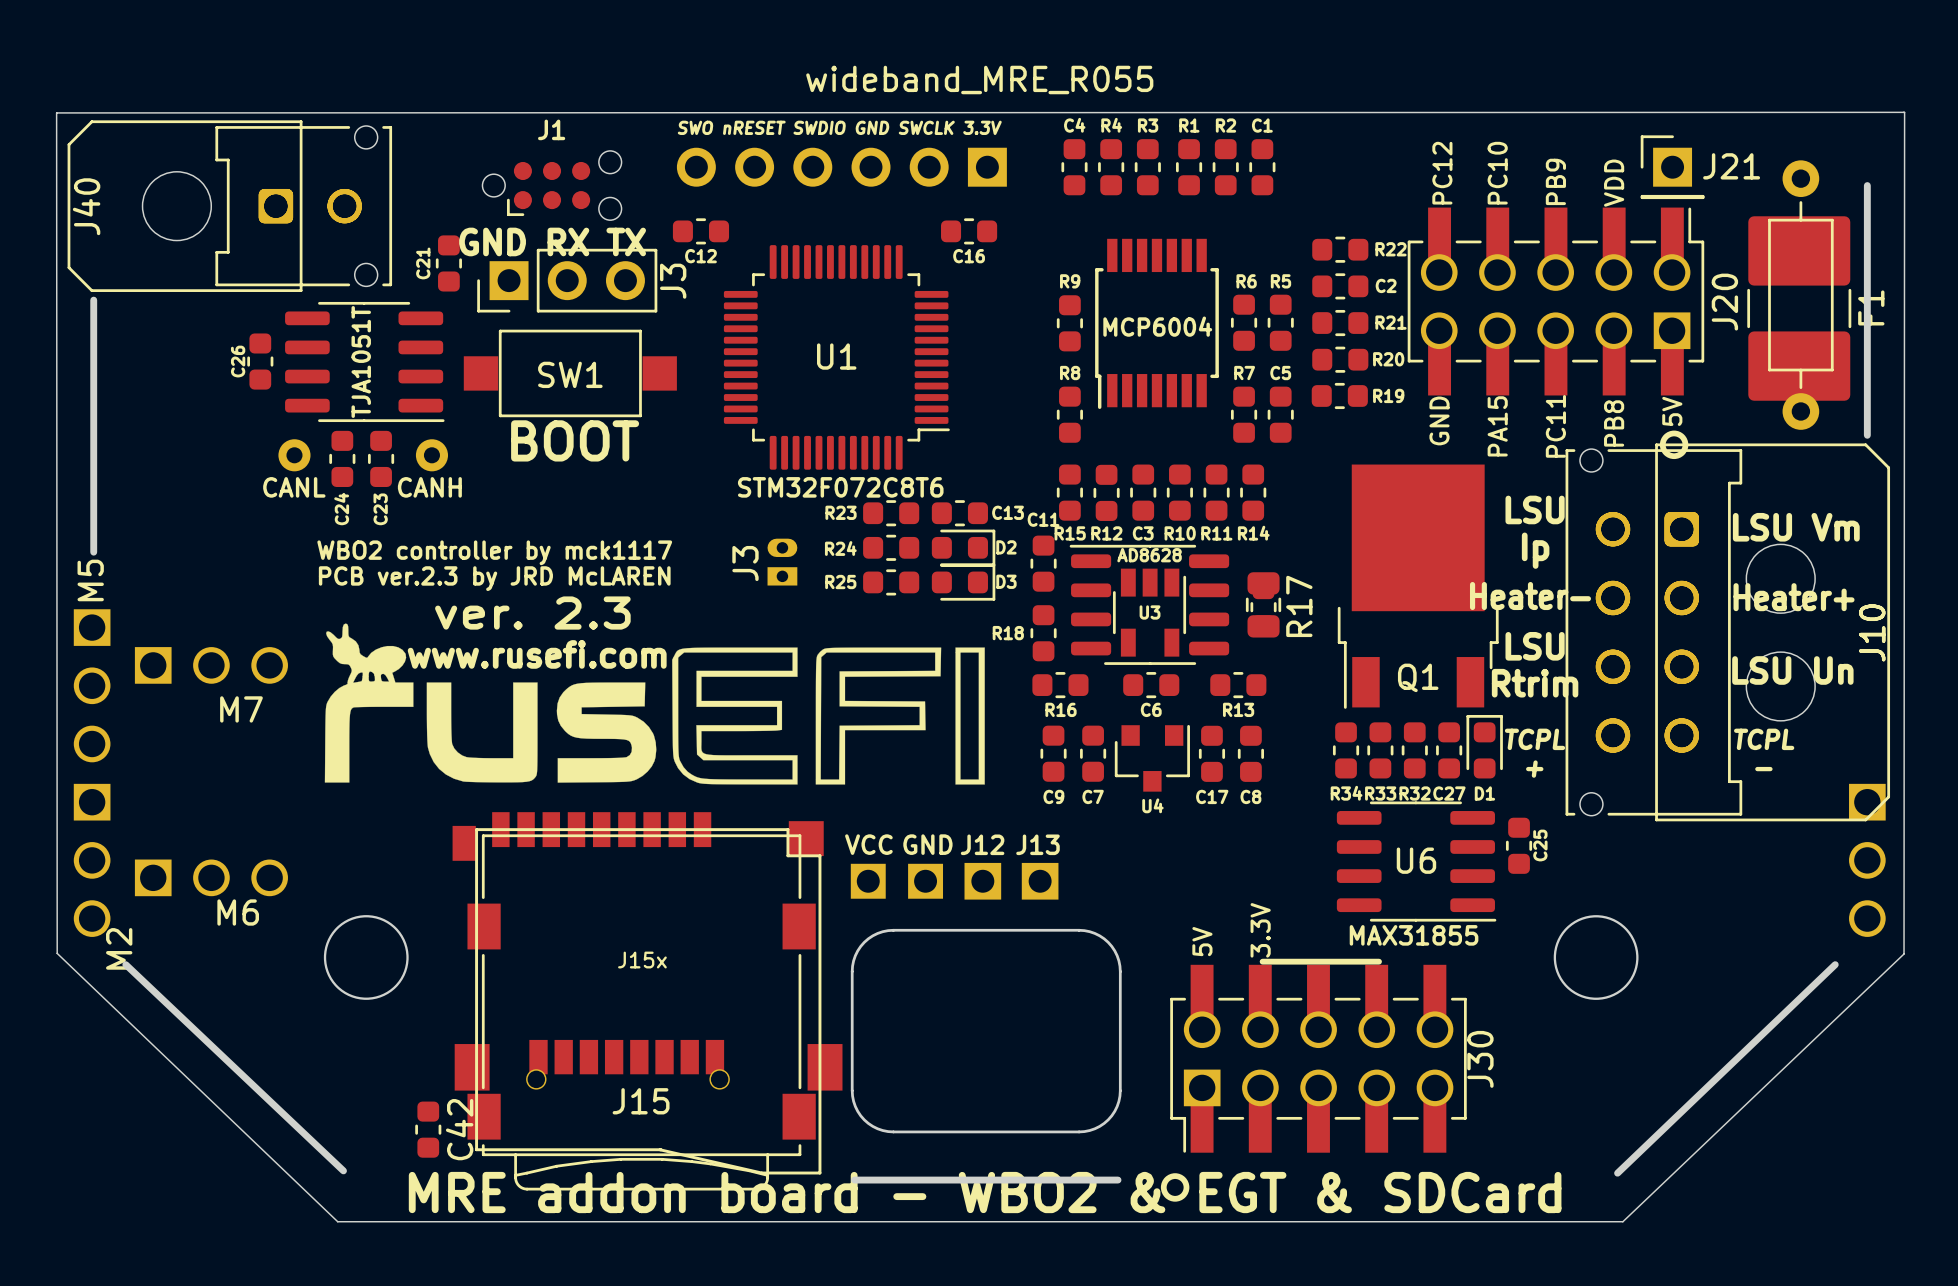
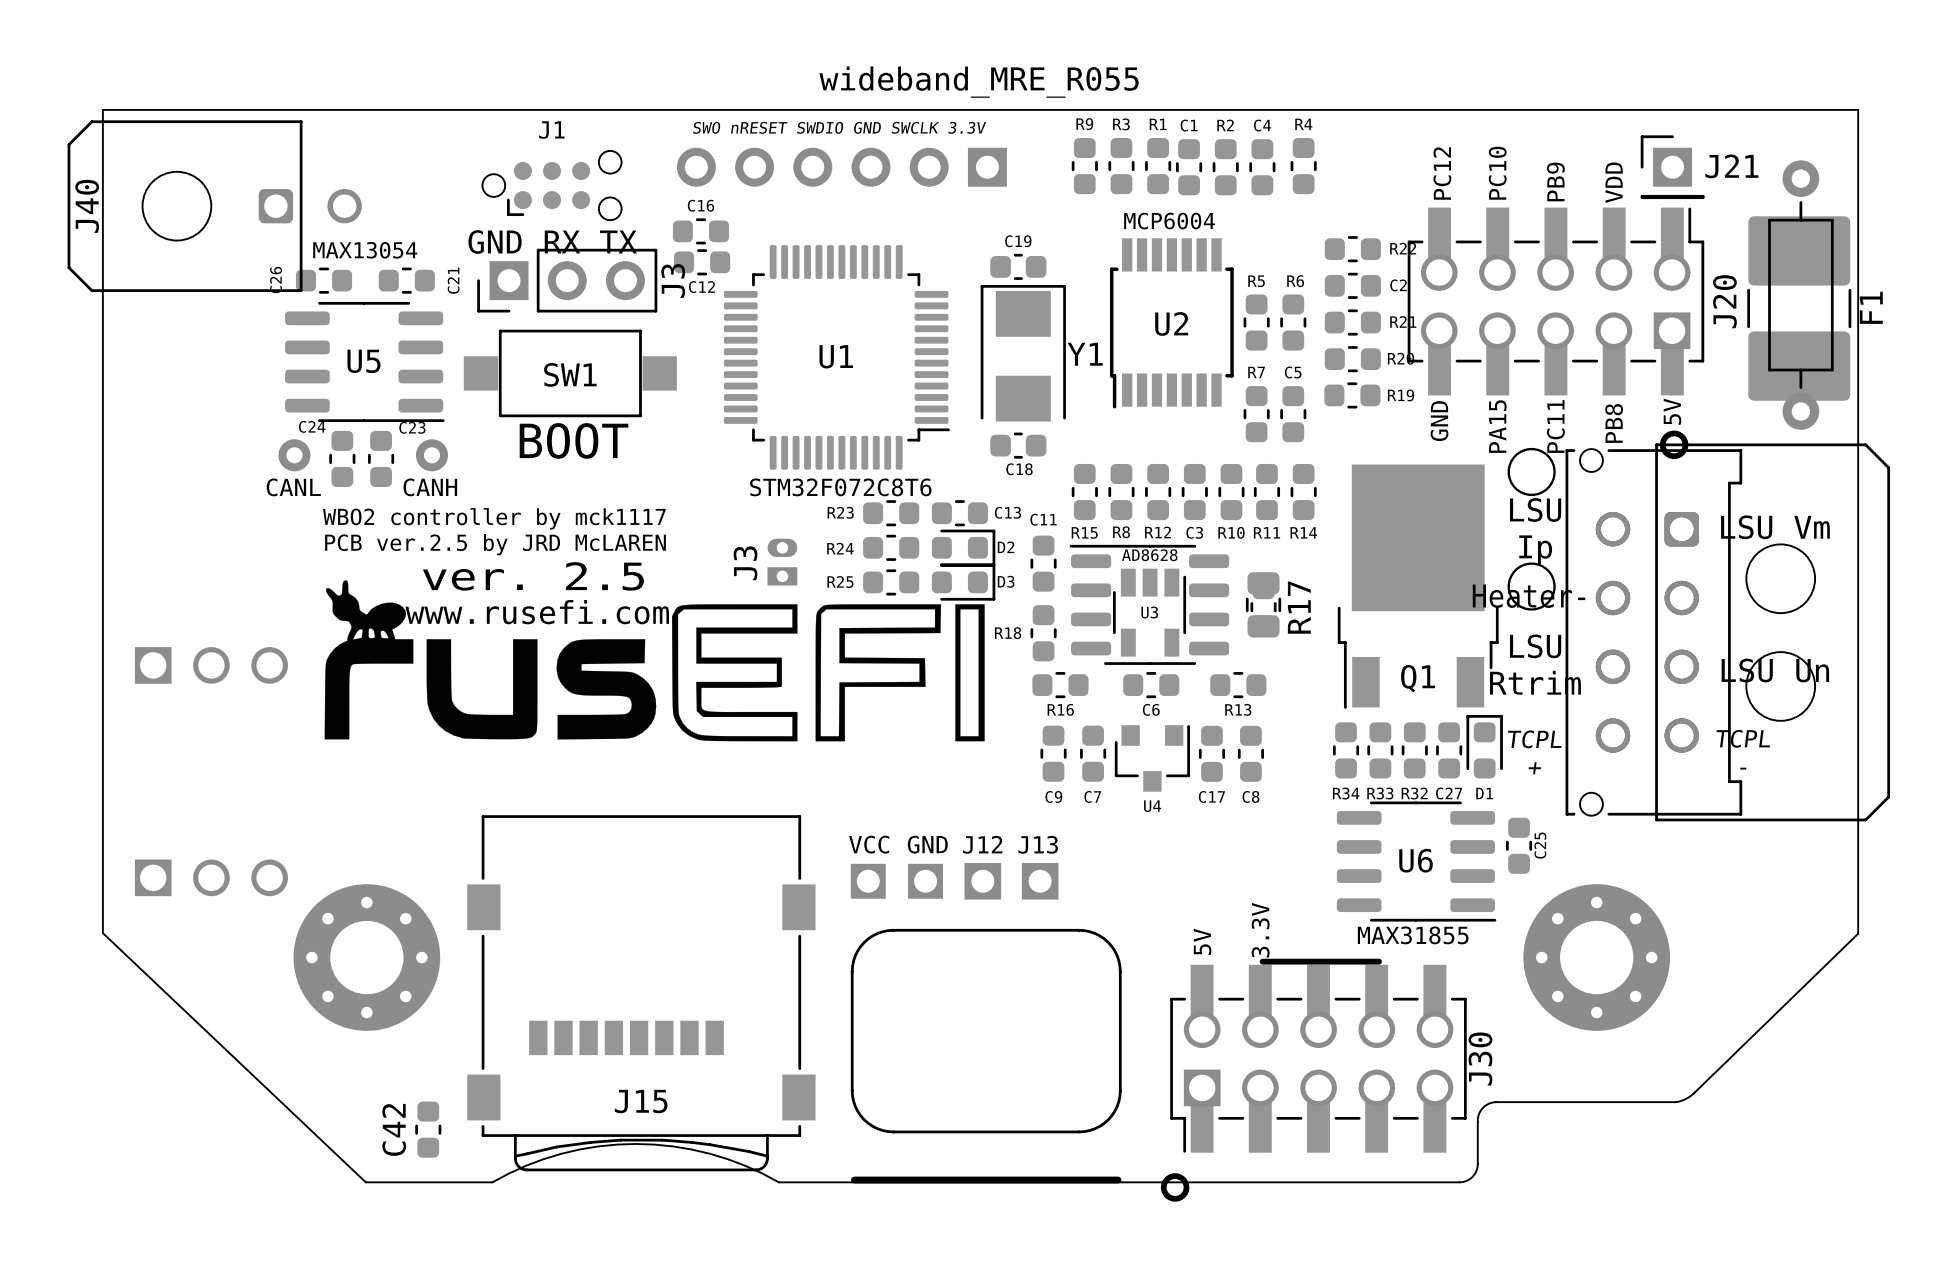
board edge: (1903, 112) (1904, 953) (1622, 1221) (337, 1221) (57, 953) (56, 112) (1903, 112) -> (102, 109) (102, 933) (365, 1182) (492, 1182) (526, 1165) (561, 1153) (598, 1146) (635, 1143) (673, 1146) (709, 1153) (745, 1165) (778, 1182) (1461, 1182) (1470, 1178) (1477, 1168) (1478, 1117) (1485, 1105) (1495, 1102) (1676, 1102) (1683, 1100) (1694, 1092) (1858, 933) (1858, 109) (102, 109)
R1 name: R1 (1189, 125) -> C1 (1189, 125)
C1 name: C1 (1262, 125) -> C4 (1262, 125)
R1: none -> (1158, 166)
C4: (1074, 167) -> none
R4 position: (1111, 167) -> (1303, 166)
R3 position: (1147, 167) -> (1121, 166)
board edge: (1867, 185) (1867, 435) -> none
part: (303, 206) -> none
C16: (969, 231) -> none
text: none -> MAX13054 (365, 250)
R22 position: (1340, 249) -> (1352, 249)
C12 name: C12 (700, 256) -> C16 (700, 205)
C12: none -> (702, 262)
C21 name position: C21 (423, 263) -> C21 (453, 280)
C21 rotation: 0° (448, 263) -> 90° clockwise (406, 280)
C21 position: (448, 263) -> (406, 280)
C19: none -> (1018, 266)
C2 position: (1340, 286) -> (1352, 285)
board edge: (93, 300) (93, 552) -> none
R6 position: (1244, 322) -> (1293, 322)
R5 position: (1280, 322) -> (1256, 322)
R9 position: (1069, 323) -> (1084, 166)
U2 position: (1156, 323) -> (1171, 323)
U2 name: none -> U2 (1171, 323)
R21 position: (1340, 323) -> (1352, 322)
text position: MCP6004 (1157, 326) -> MCP6004 (1169, 221)
Y1: none -> (1023, 353)
R20 position: (1340, 359) -> (1352, 359)
C26 rotation: 0° (260, 361) -> 90° clockwise (324, 280)
C26 position: (260, 361) -> (324, 280)
text: TJA1051T (361, 361) -> none
U5 name: none -> U5 (363, 361)
R8 name position: R8 (1070, 373) -> R8 (1121, 532)
R19 position: (1339, 395) -> (1352, 395)
R8 position: (1069, 414) -> (1121, 492)
R7 position: (1244, 414) -> (1256, 414)
C5 position: (1280, 414) -> (1293, 414)
C18: none -> (1018, 445)
round board edge: none -> [1507, 447, 1556, 497]
R15 position: (1069, 492) -> (1084, 492)
R12 position: (1106, 492) -> (1158, 492)
C3 position: (1143, 492) -> (1194, 492)
R10 position: (1179, 492) -> (1231, 492)
R11 position: (1216, 492) -> (1266, 492)
R14 position: (1253, 492) -> (1303, 492)
C24 name rotation: 0° (341, 509) -> 90° clockwise (312, 426)
C24 name position: C24 (341, 509) -> C24 (312, 426)
C23 name rotation: 0° (380, 509) -> 90° clockwise (412, 427)
C23 name position: C23 (380, 509) -> C23 (412, 427)
text position: LSU Vm (1796, 527) -> LSU Vm (1775, 527)
text position: WBO2 controller by mck1117 (494, 552) -> WBO2 controller by mck1117 (494, 518)
round board edge: none -> [1507, 562, 1556, 611]
text: PCB ver.2.3 by JRD McLAREN (494, 578) -> PCB ver.2.5 by JRD McLAREN (495, 544)
text: Heater+ (1794, 597) -> none
text: ver. 2.3 (532, 613) -> ver. 2.5 (533, 576)
J10 name: J10 (1872, 632) -> none
J10 name: J10 (1872, 632) -> none
text position: www.rusefi.com (537, 654) -> www.rusefi.com (537, 612)
text position: LSU Un (1792, 670) -> LSU Un (1775, 670)
drawing position: (654, 704) -> (654, 660)
part: none -> wideband_MRE_R055 (912, 727)
part: wideband_MRE_R055 (979, 727) -> none
text position: TCPL (1764, 739) -> TCPL (1743, 738)
text position: - (1763, 769) -> - (1743, 768)
round board edge: [323, 915, 409, 1000] -> none
round board edge: [1553, 915, 1639, 1000] -> none
part: none -> (366, 957)
part: none -> (1596, 957)
board edge: (125, 964) (343, 1170) -> none
board edge: (1835, 964) (1617, 1173) -> none
J15x: (647, 993) -> none
J15 position: (641, 1012) -> (641, 993)
C42 name position: C42 (459, 1129) -> C42 (394, 1129)
text: MRE addon board - WBO2 & EGT & SDCard (985, 1192) -> none

